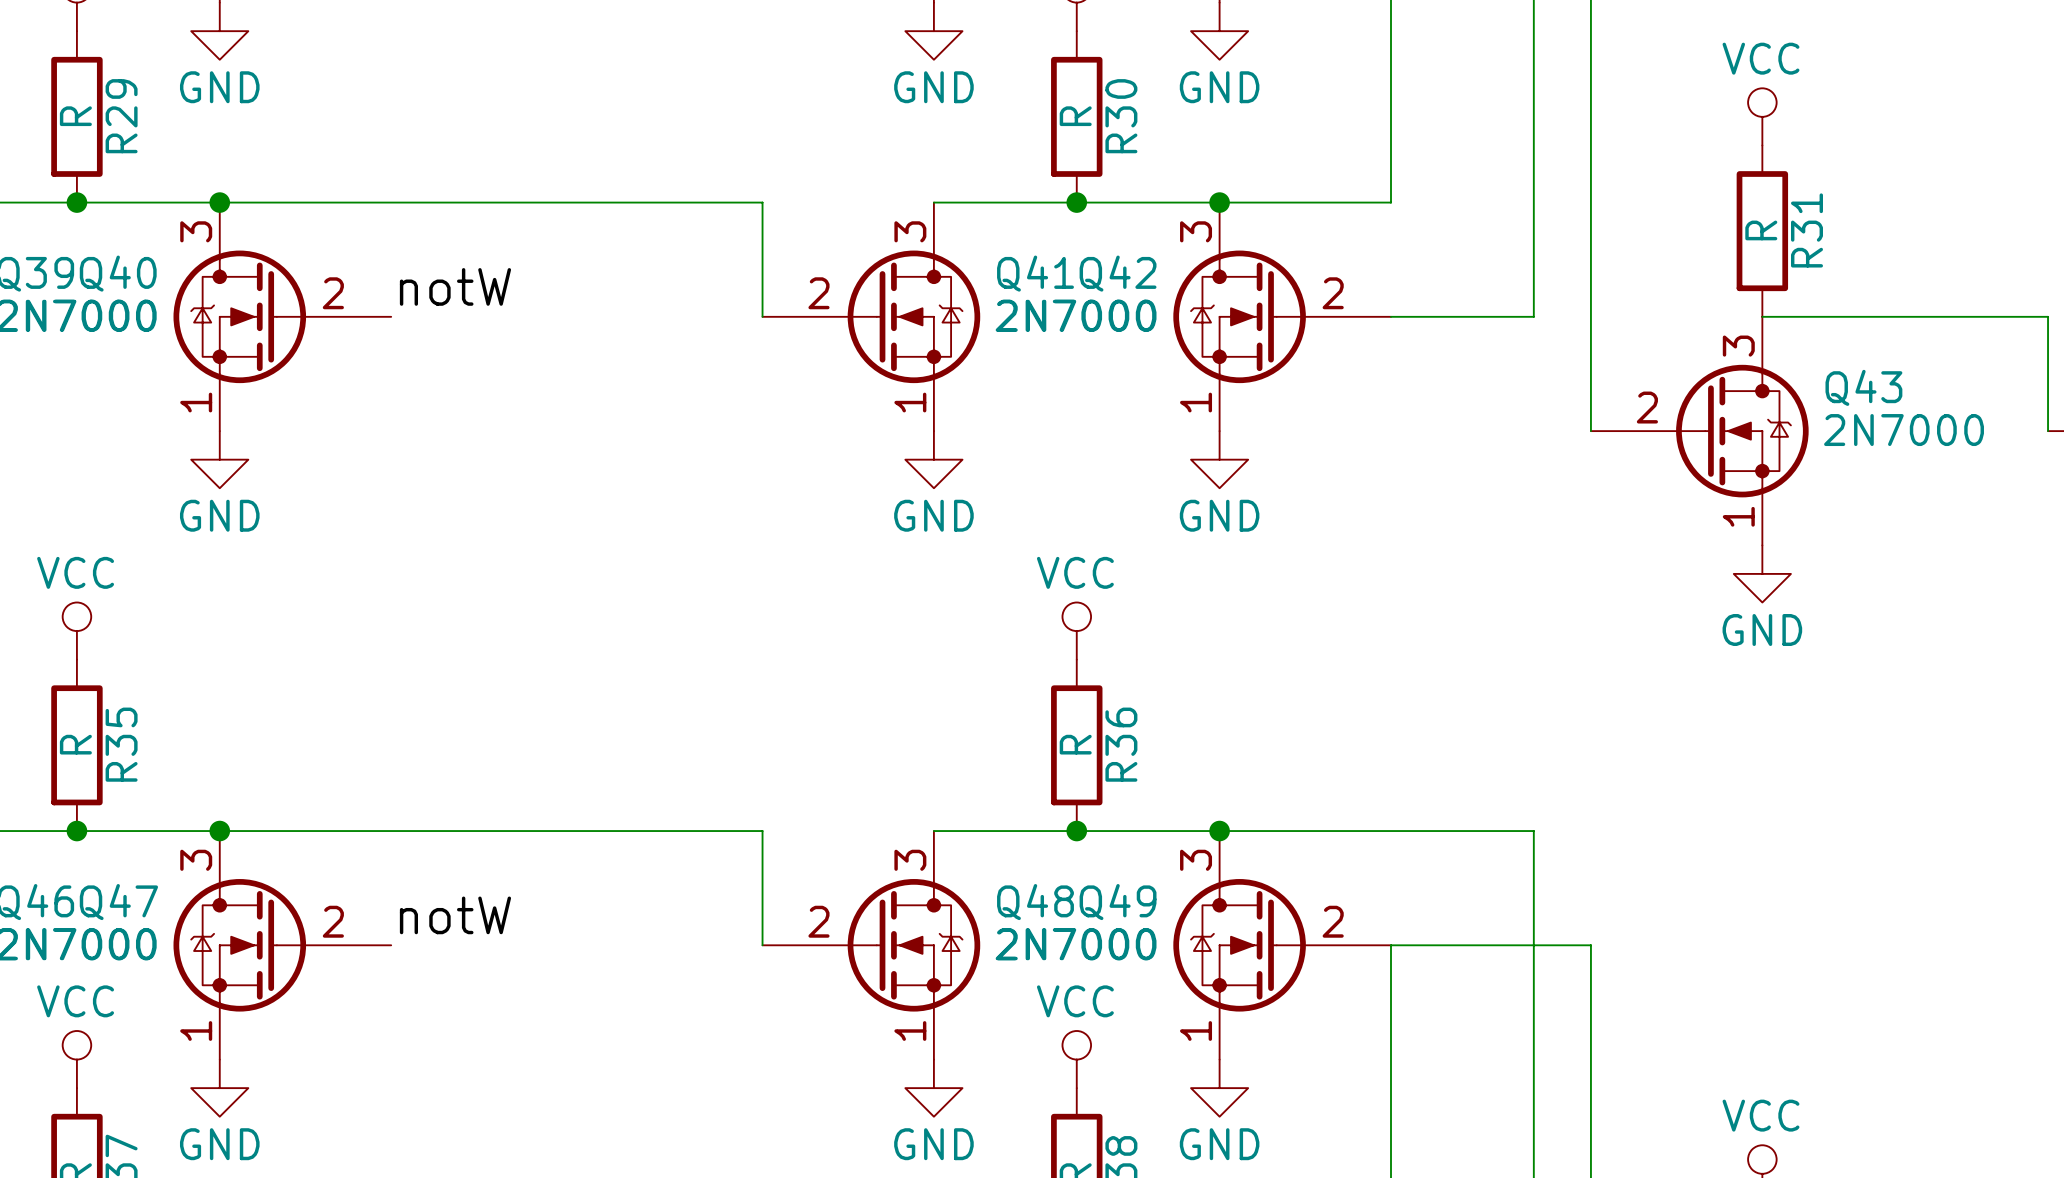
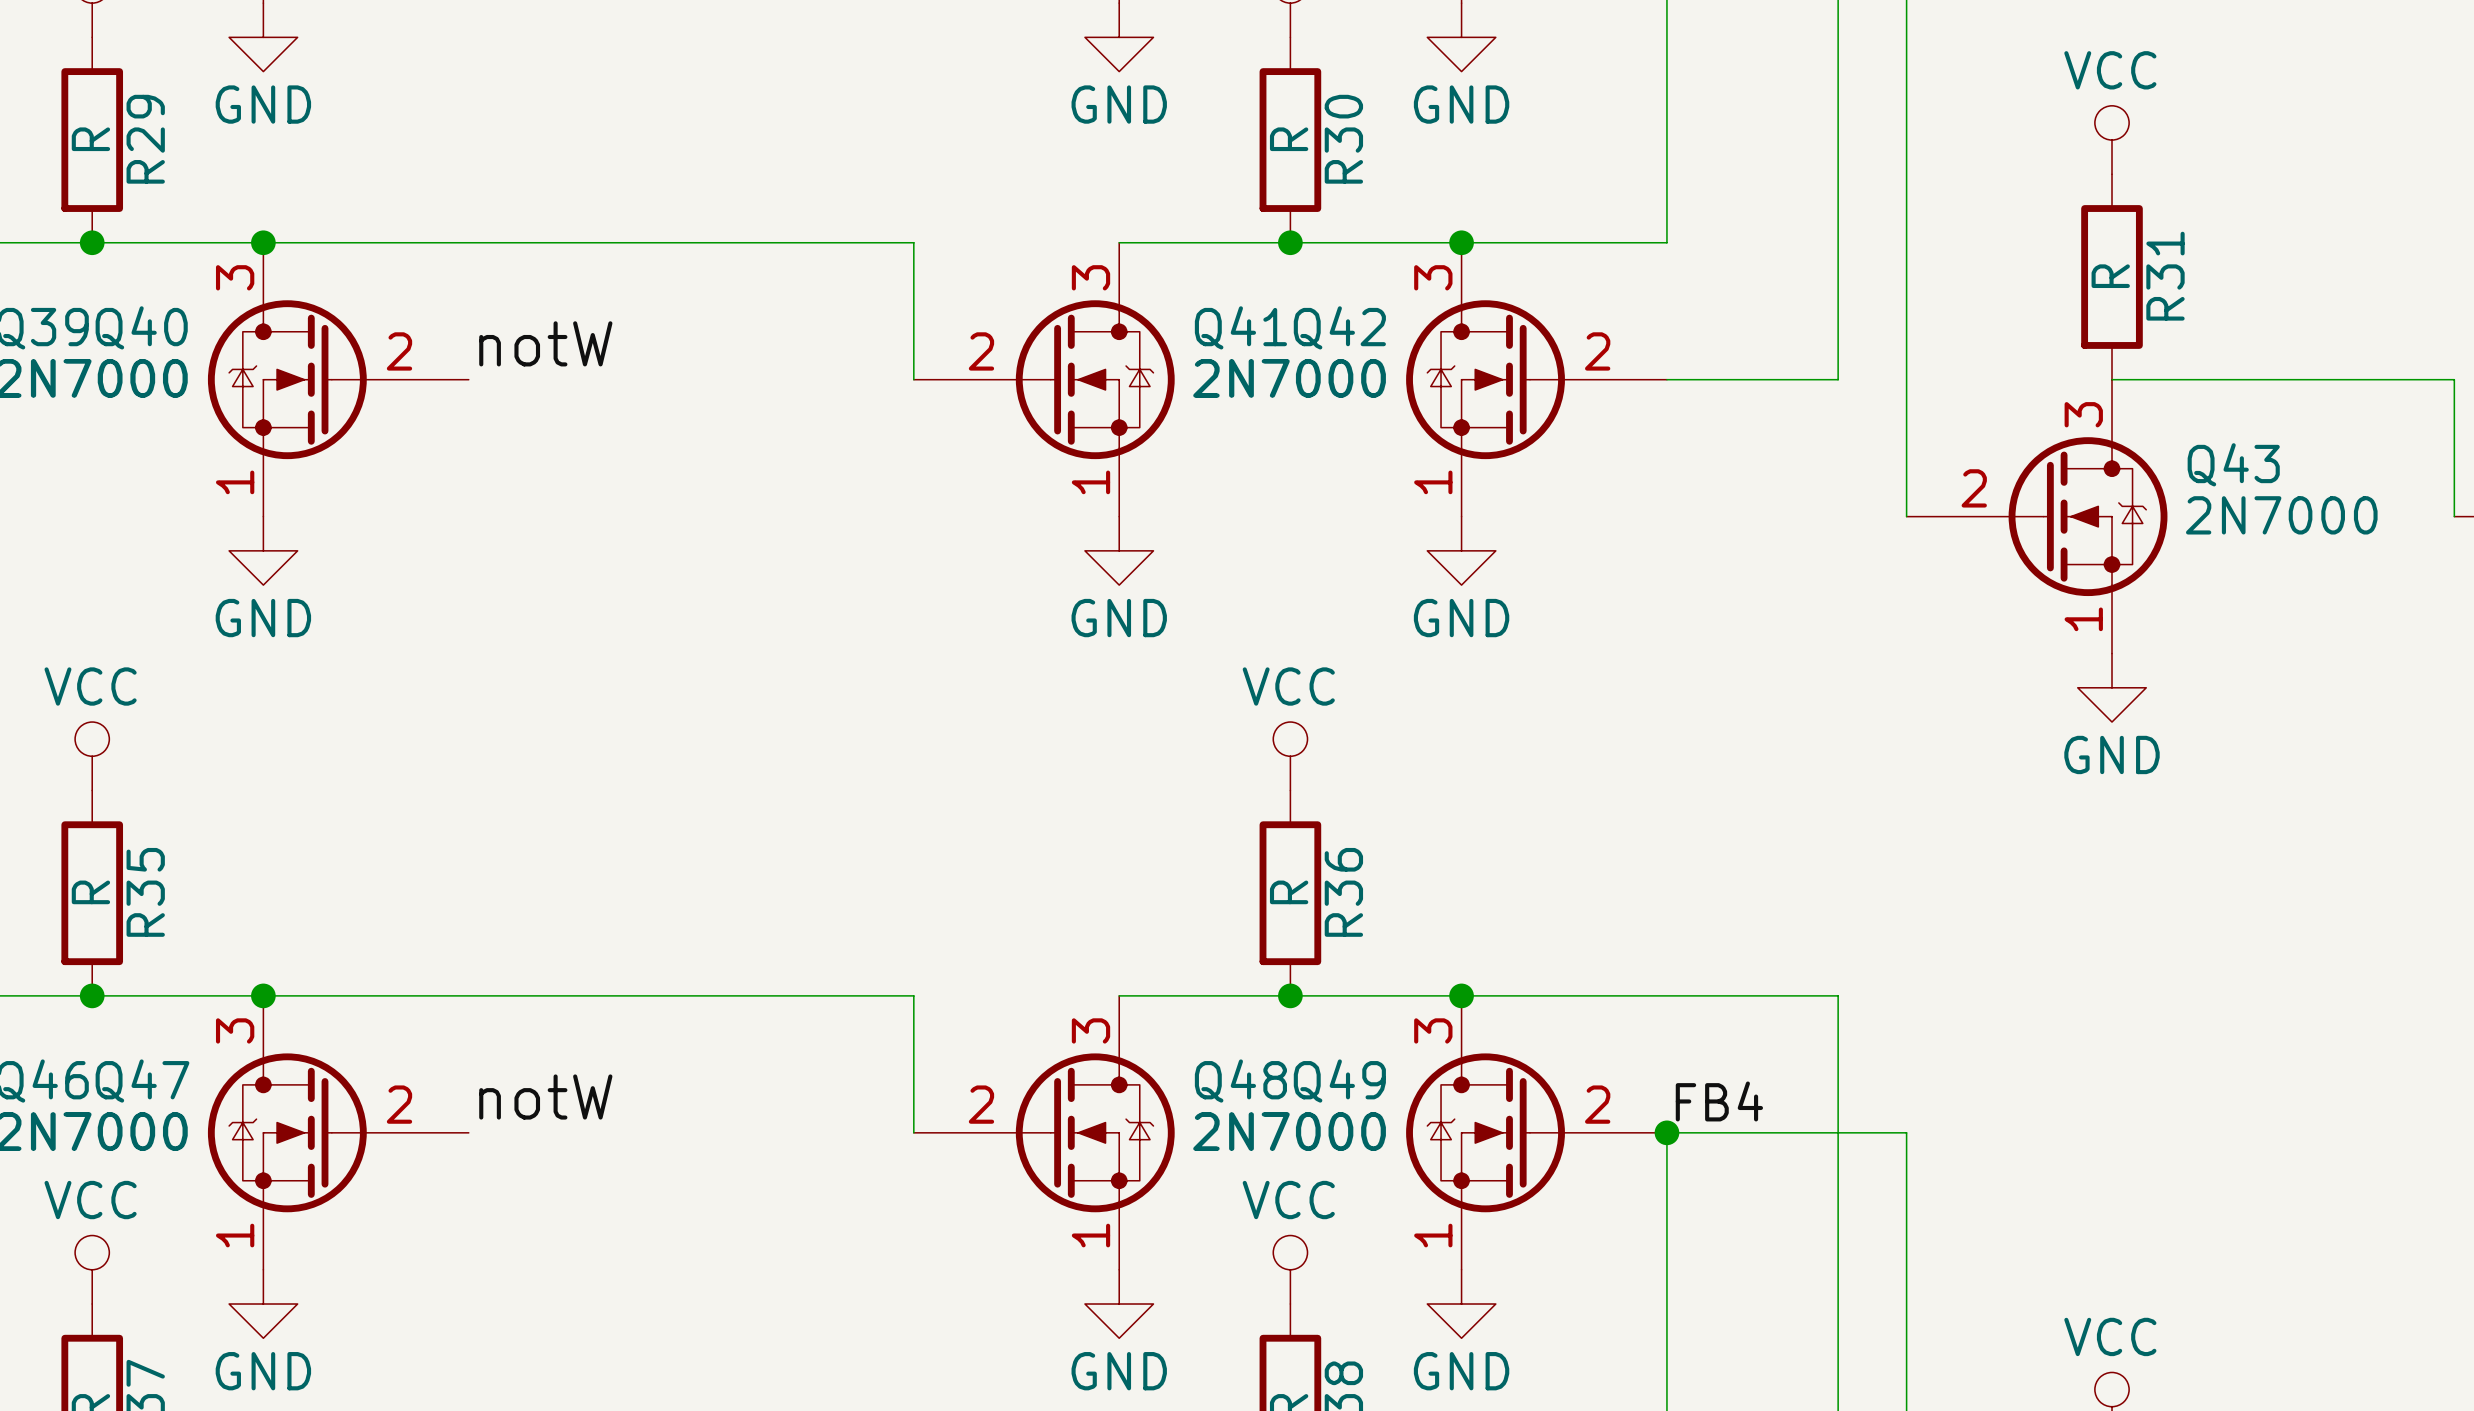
label: none -> FB4 (1719, 1101)
junction: none -> (1666, 1132)

